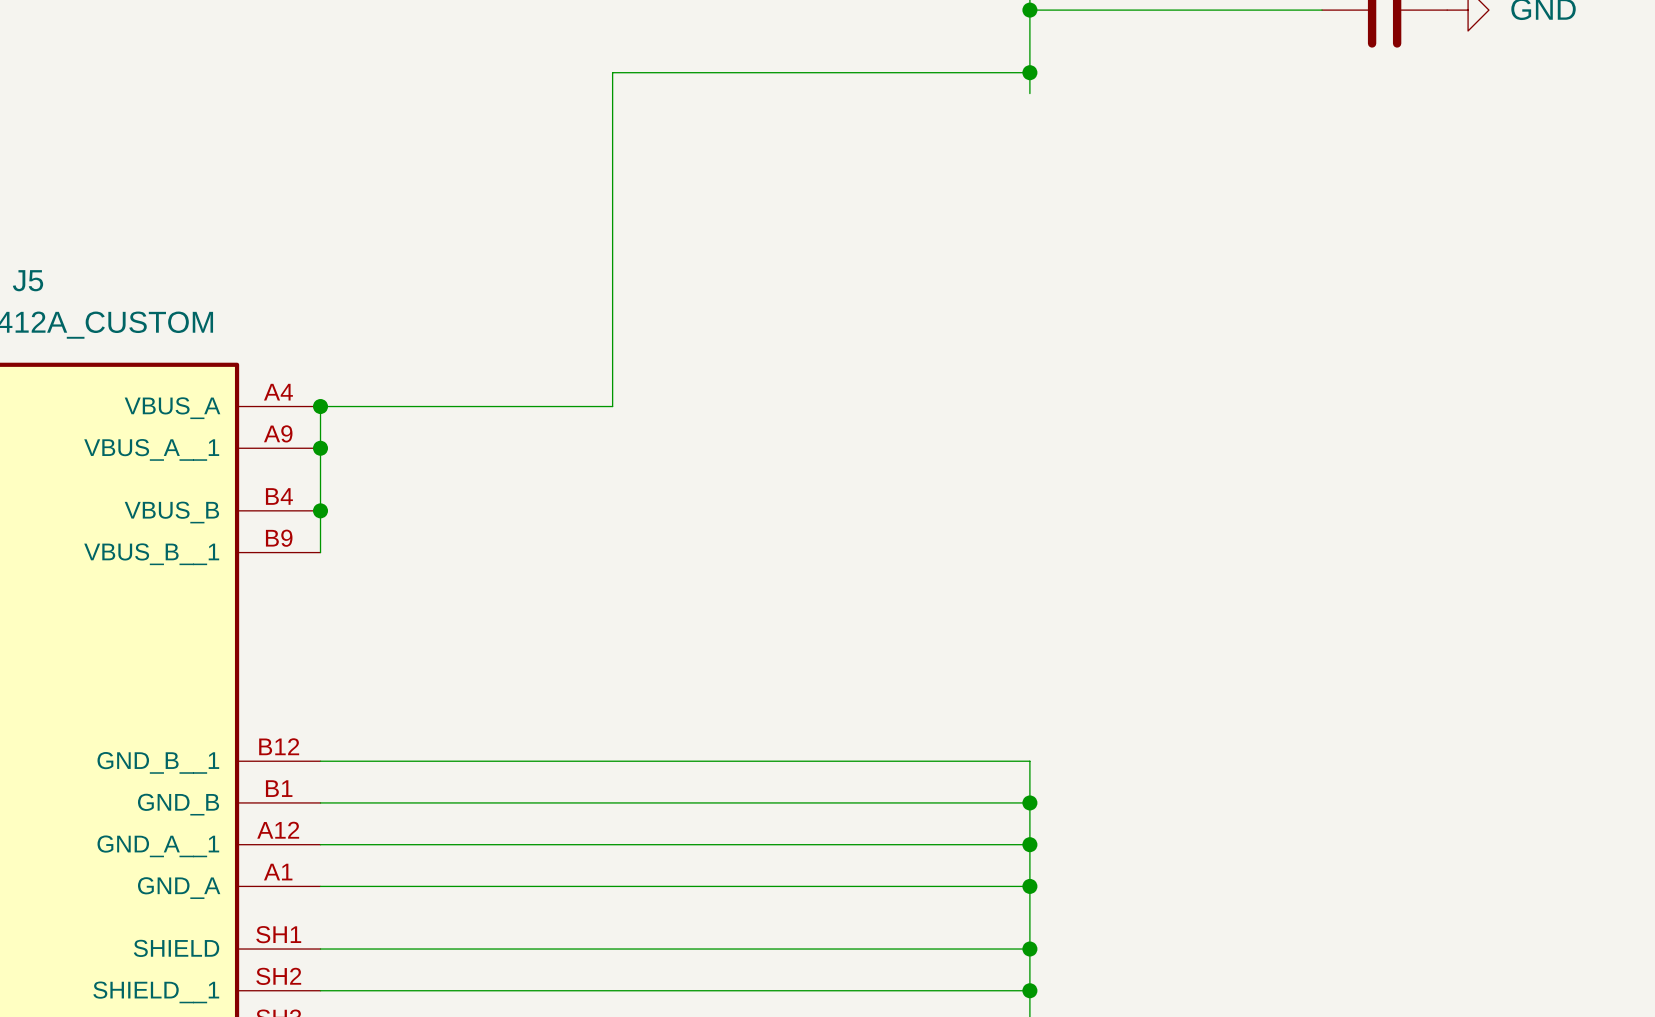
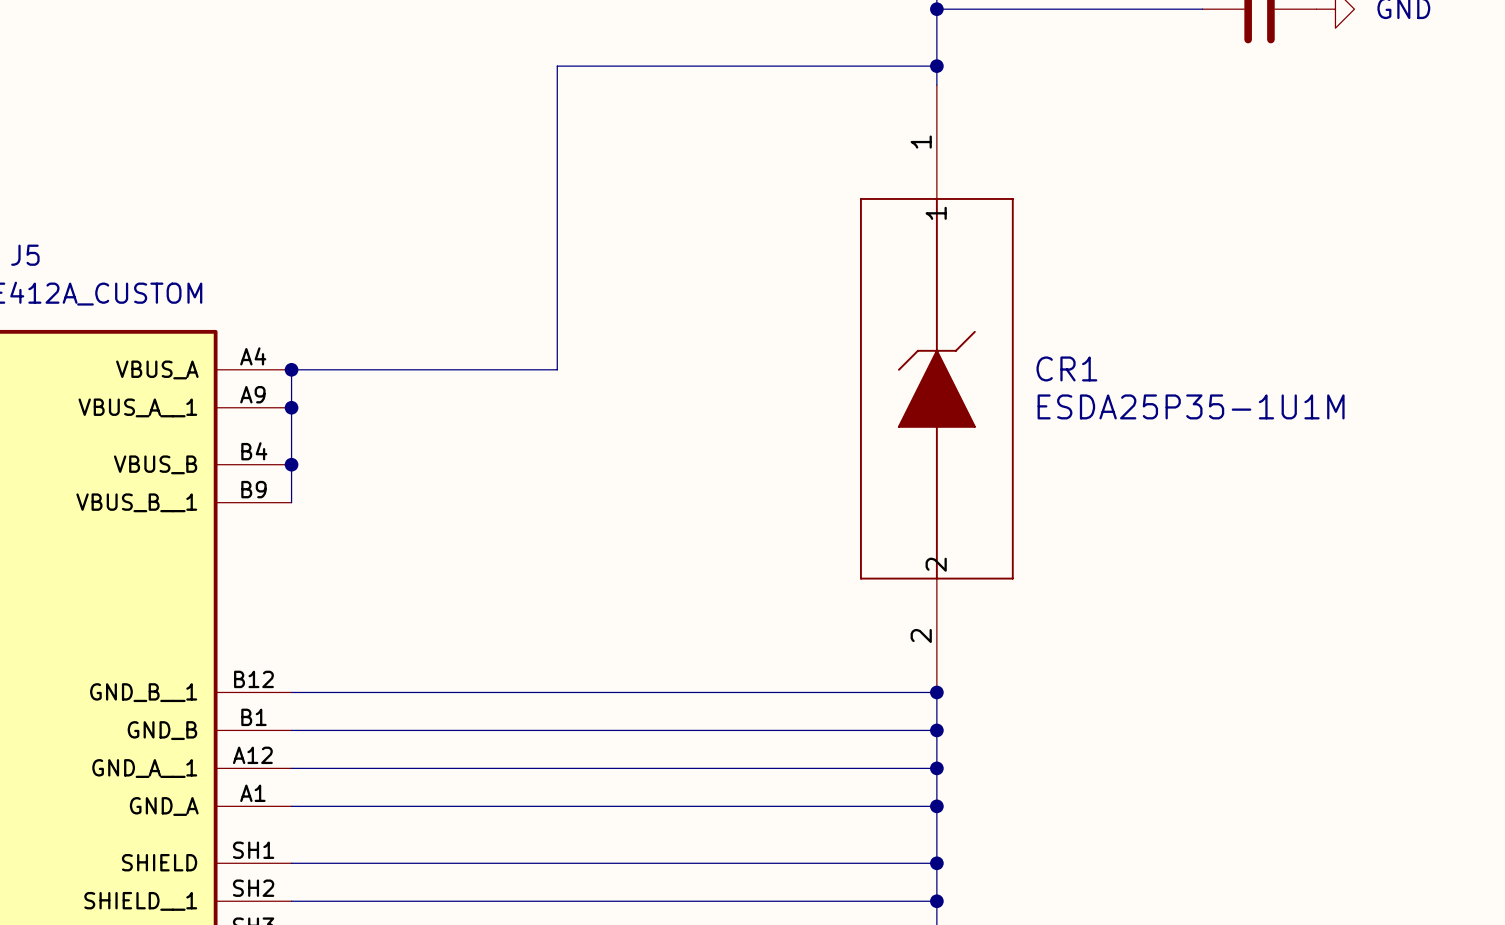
CR1: none -> ESDA25P35-1U1M (936, 388)
junction: none -> (936, 692)

